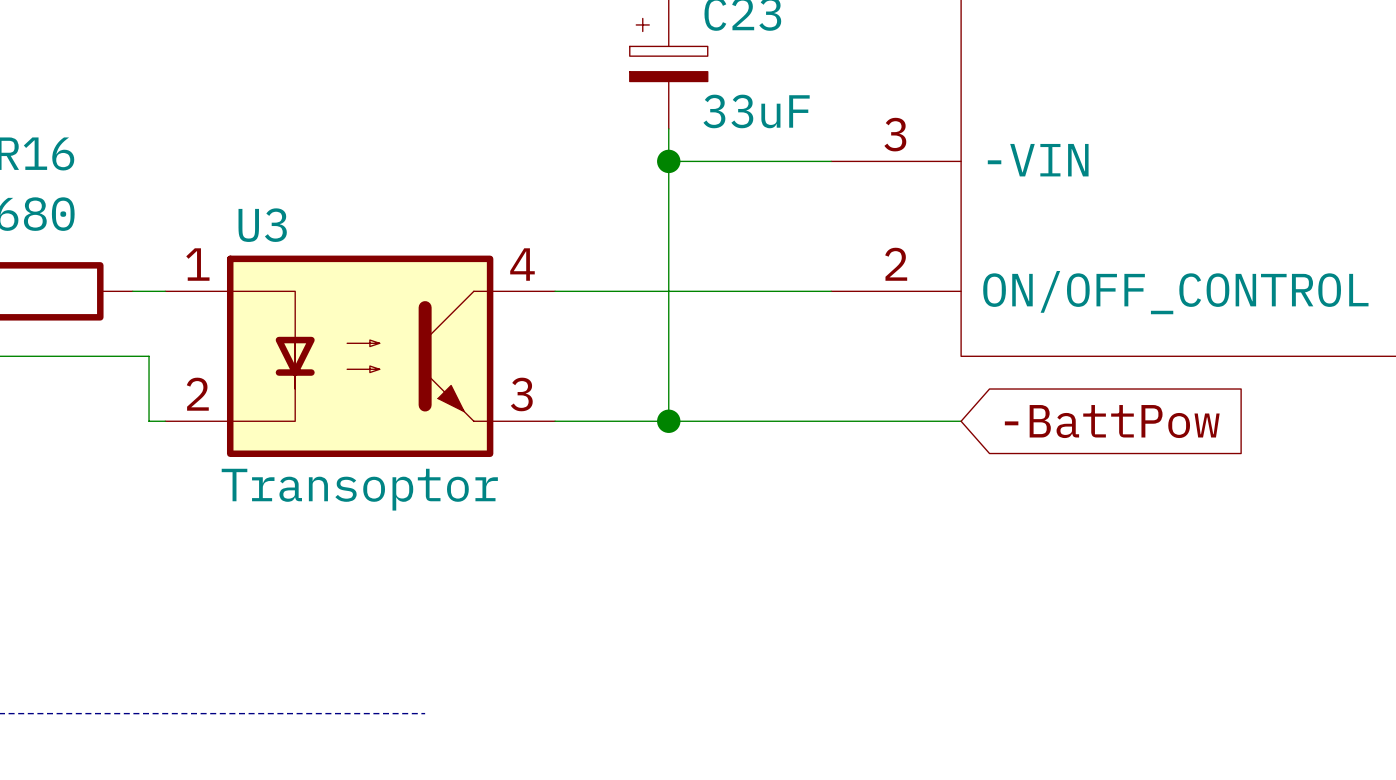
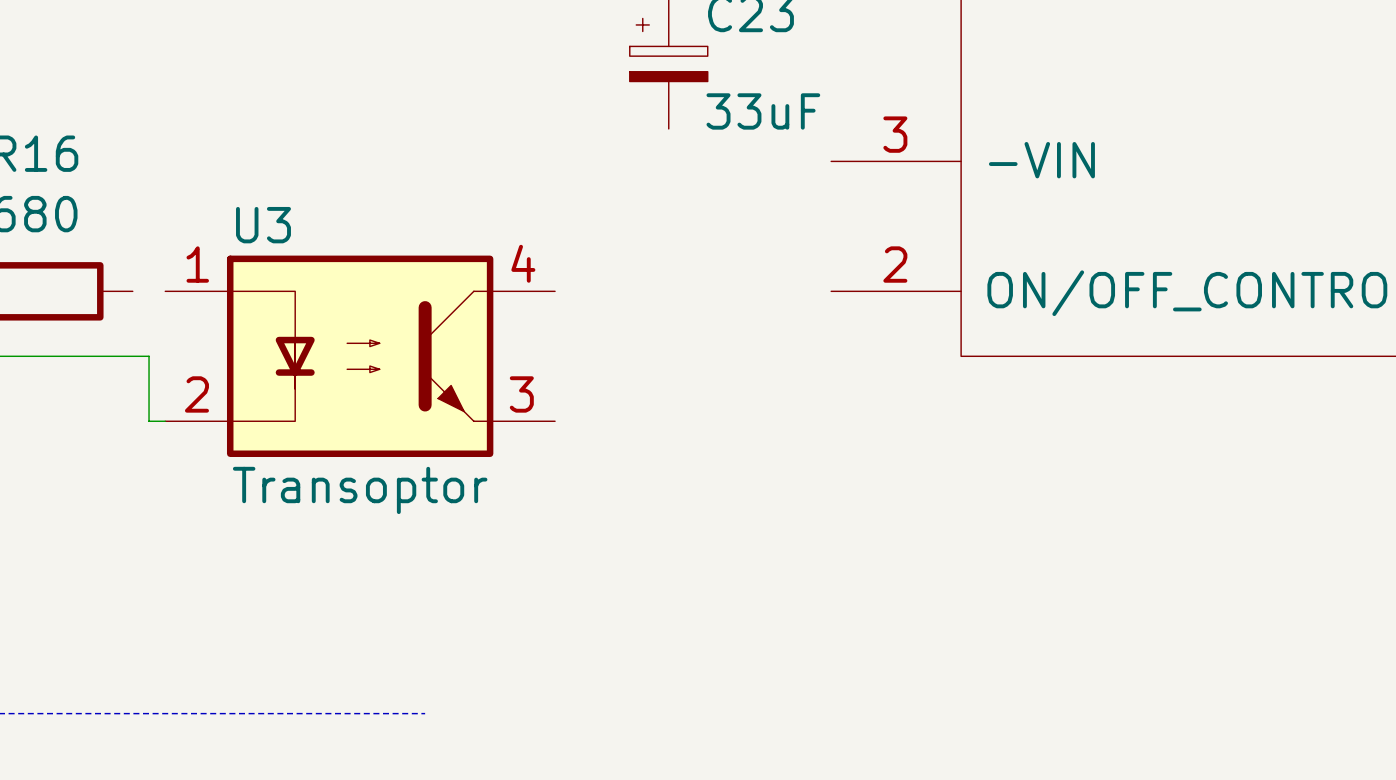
wire: (668, 128) (668, 421) -> none
wire: (668, 161) (831, 161) -> none
junction: (668, 161) -> none
wire: (132, 291) (165, 291) -> none
wire: (555, 291) (831, 291) -> none
wire: (555, 421) (961, 421) -> none
junction: (668, 421) -> none
global label: -BattPow (1112, 421) -> none

